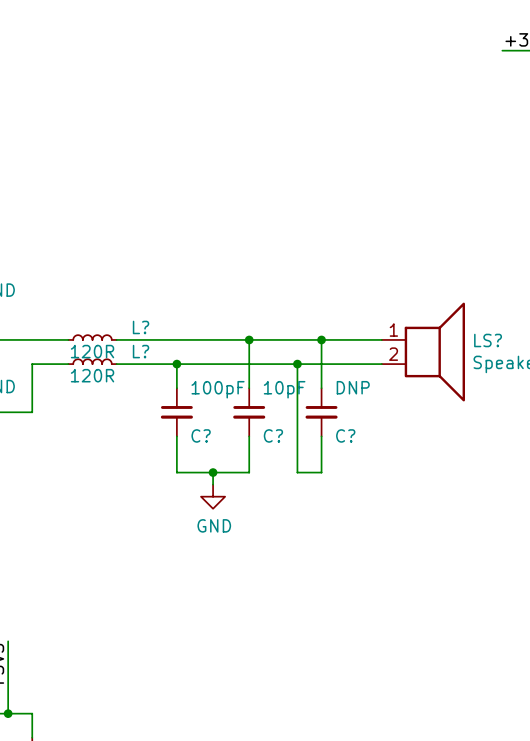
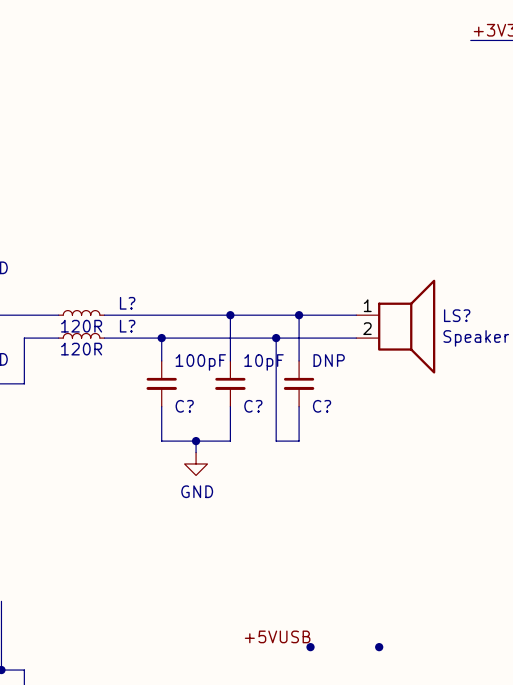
label: none -> +5VUSB (277, 636)
junction: none -> (310, 647)
junction: none -> (379, 647)

